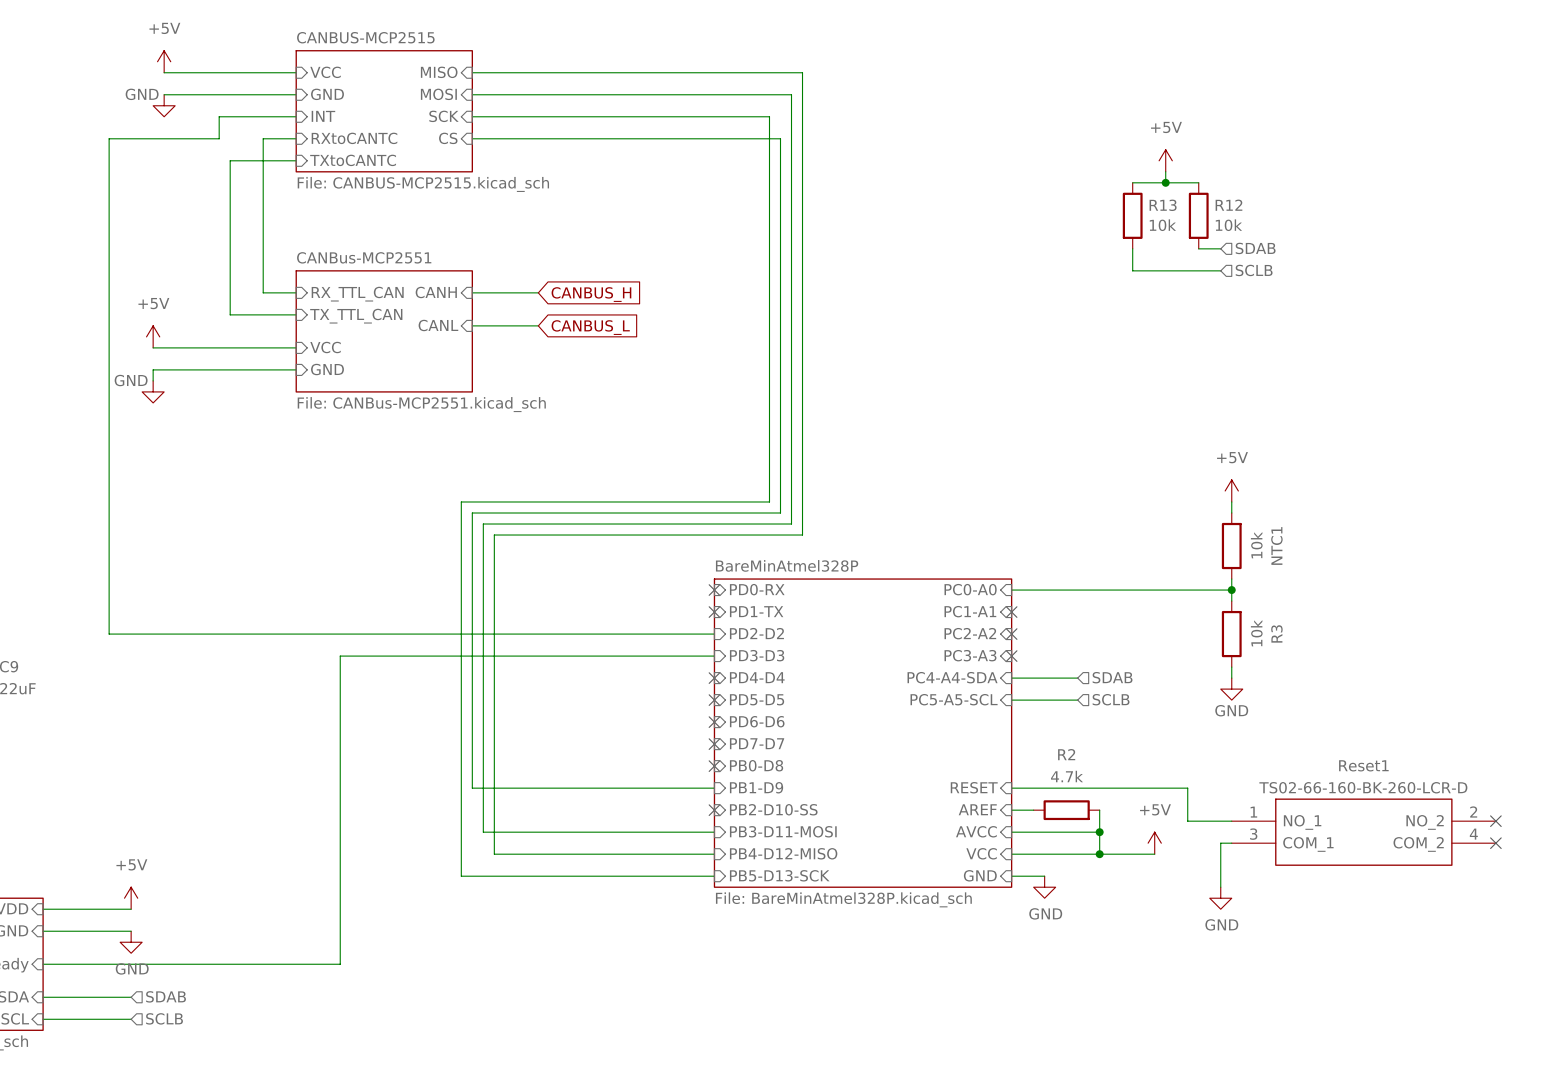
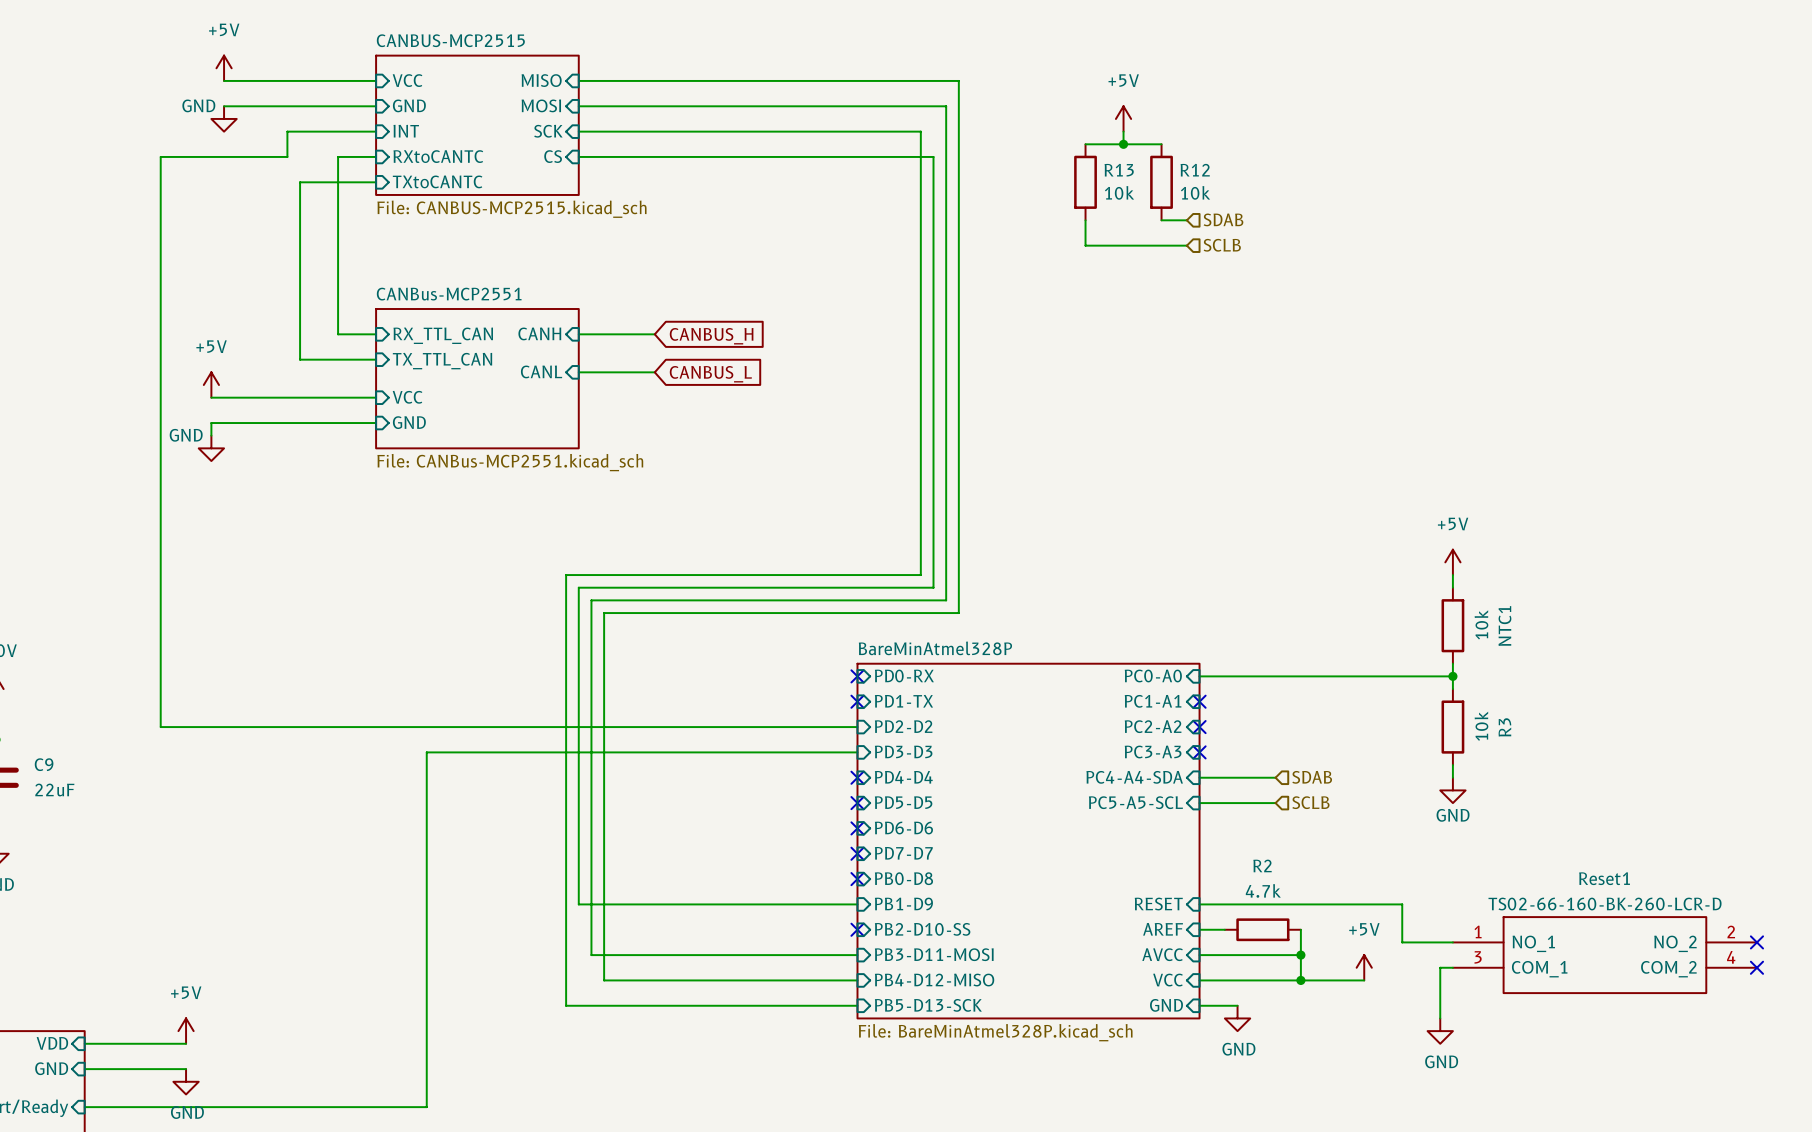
power symbol: none -> +5V (1123, 118)
wire: none -> (1123, 131) (1123, 144)
wire: none -> (1085, 144) (1161, 144)
junction: none -> (1123, 144)
power symbol: +5V (1165, 160) -> none
wire: (1165, 171) (1165, 182) -> none
wire: (1132, 182) (1198, 182) -> none
junction: (1165, 182) -> none
wire: none -> (1085, 220) (1085, 245) (1186, 245)
wire: none -> (1161, 220) (1186, 220)
hierarchical label: none -> SDAB (1223, 219)
hierarchical label: none -> SCLB (1222, 245)
R13 position: (1132, 215) -> (1085, 182)
R12 position: (1198, 215) -> (1161, 182)
wire: (1132, 248) (1132, 270) (1220, 270) -> none
wire: (1198, 248) (1220, 248) -> none
hierarchical label: SDAB (1255, 248) -> none
hierarchical label: SCLB (1254, 270) -> none

